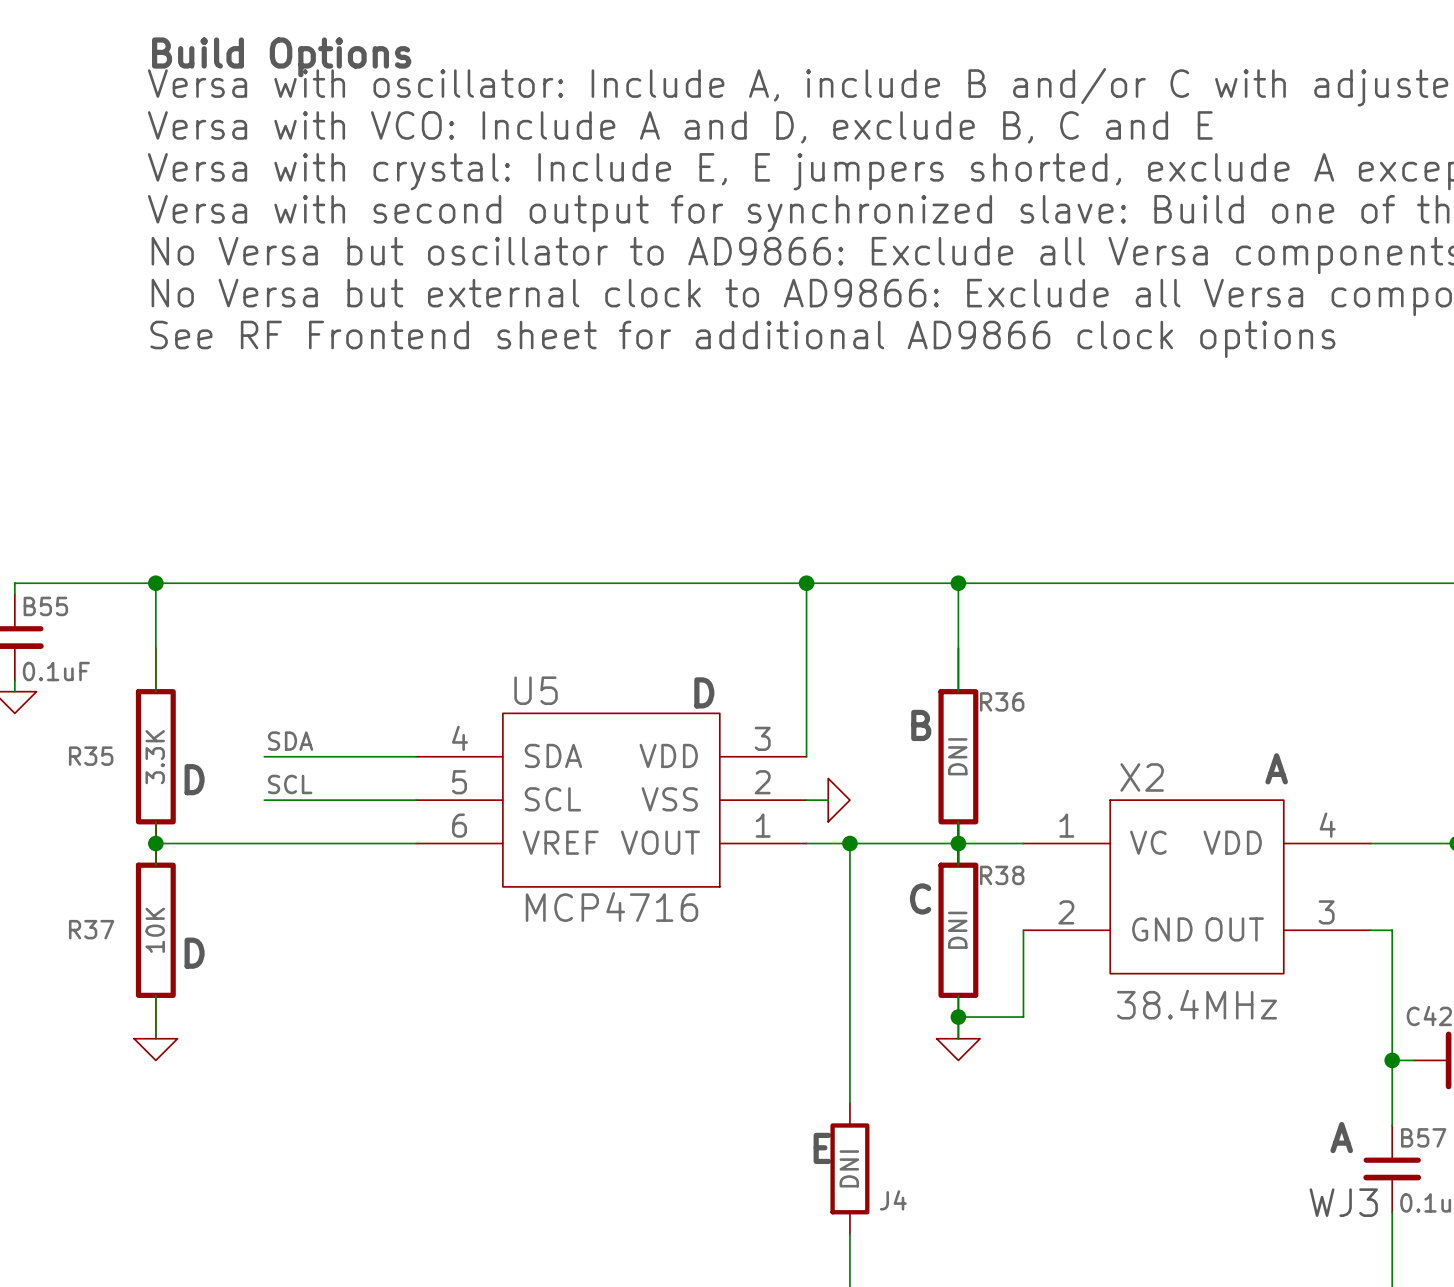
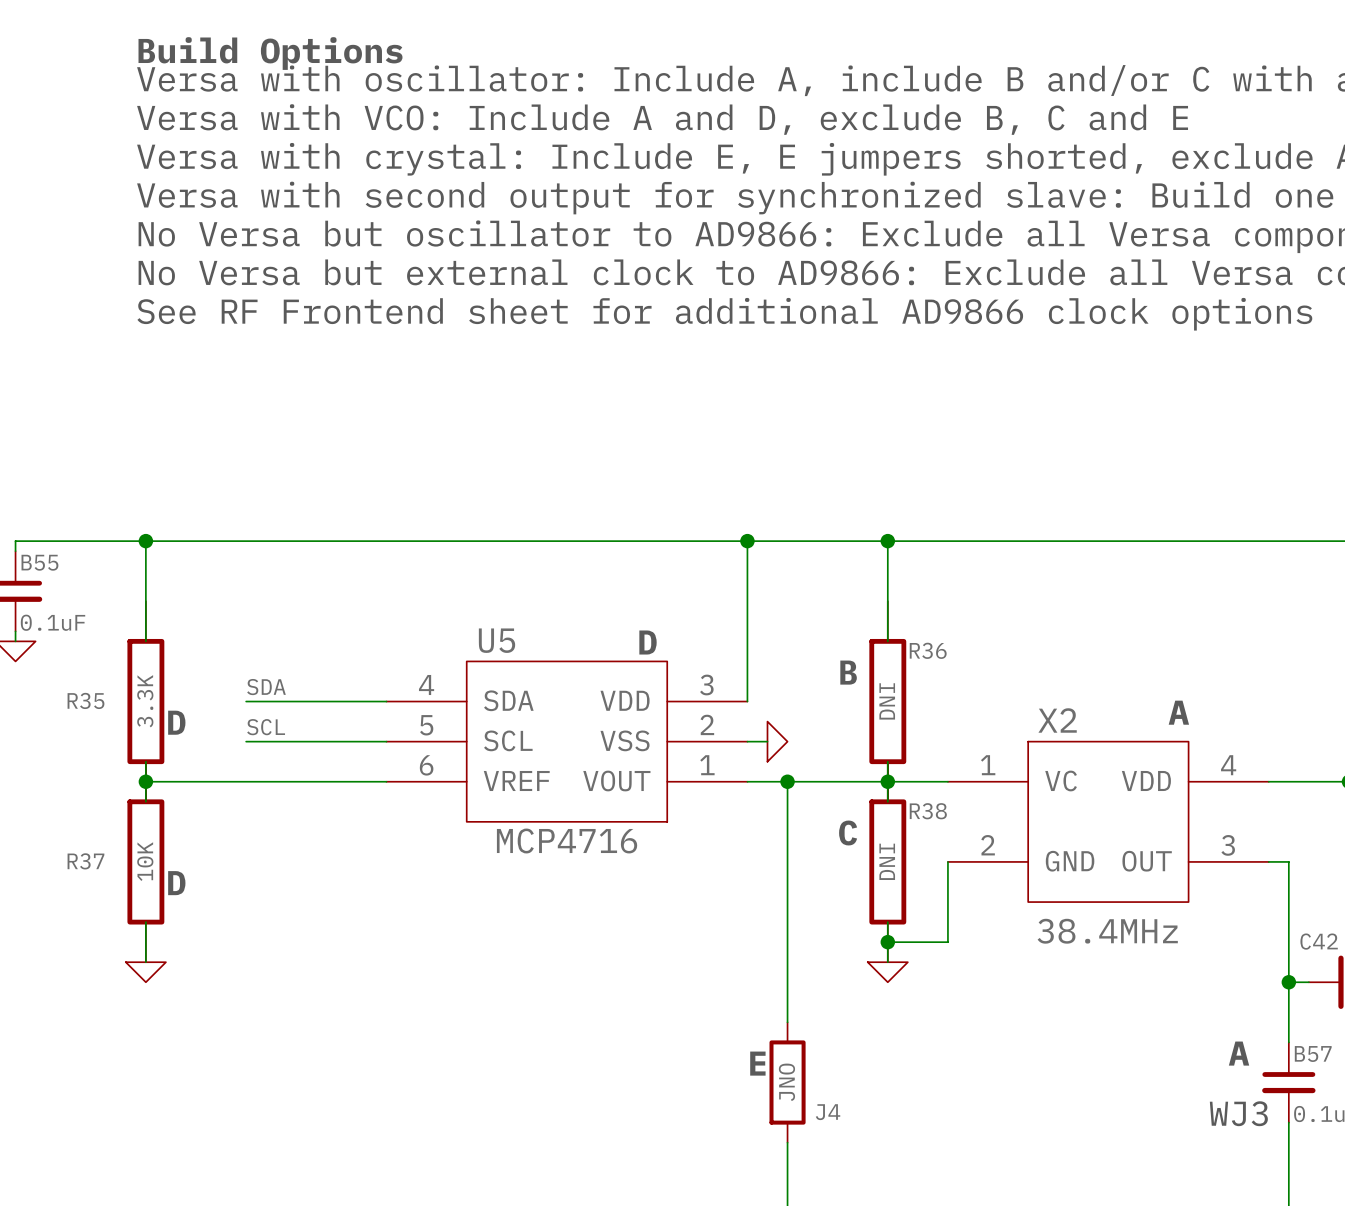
J4 value: DNI (849, 1168) -> JNO (786, 1082)

